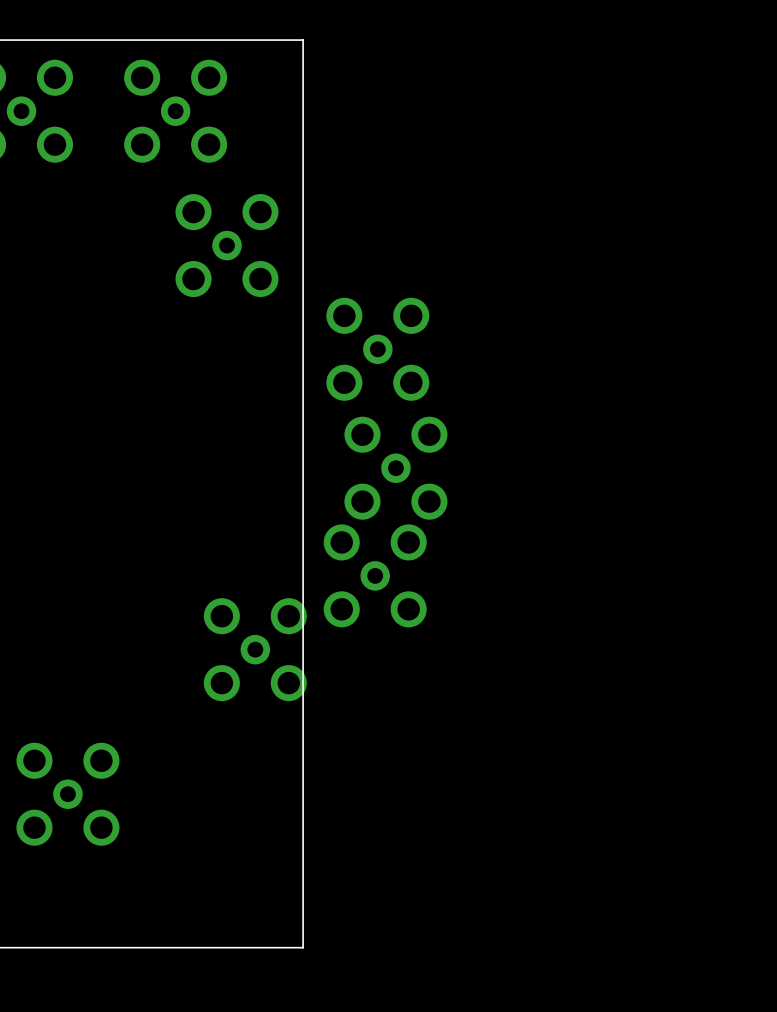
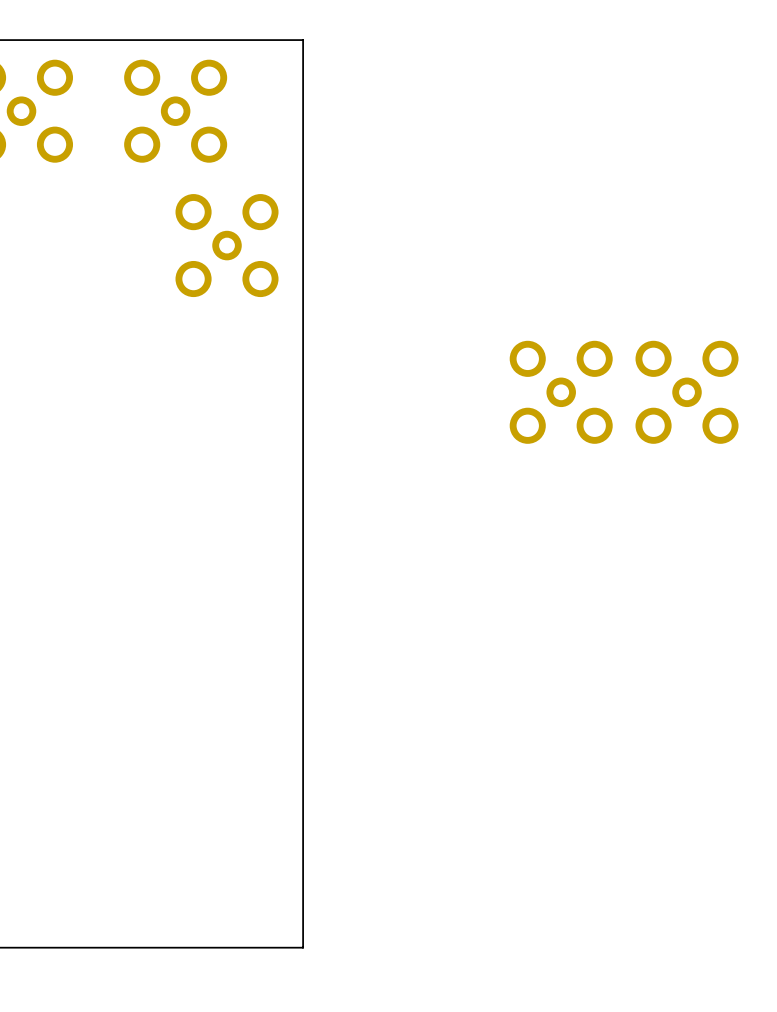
part: (377, 349) -> none
part: none -> (561, 392)
part: none -> (687, 392)
part: (395, 468) -> none
part: (375, 575) -> none
part: (255, 649) -> none
part: (67, 794) -> none

